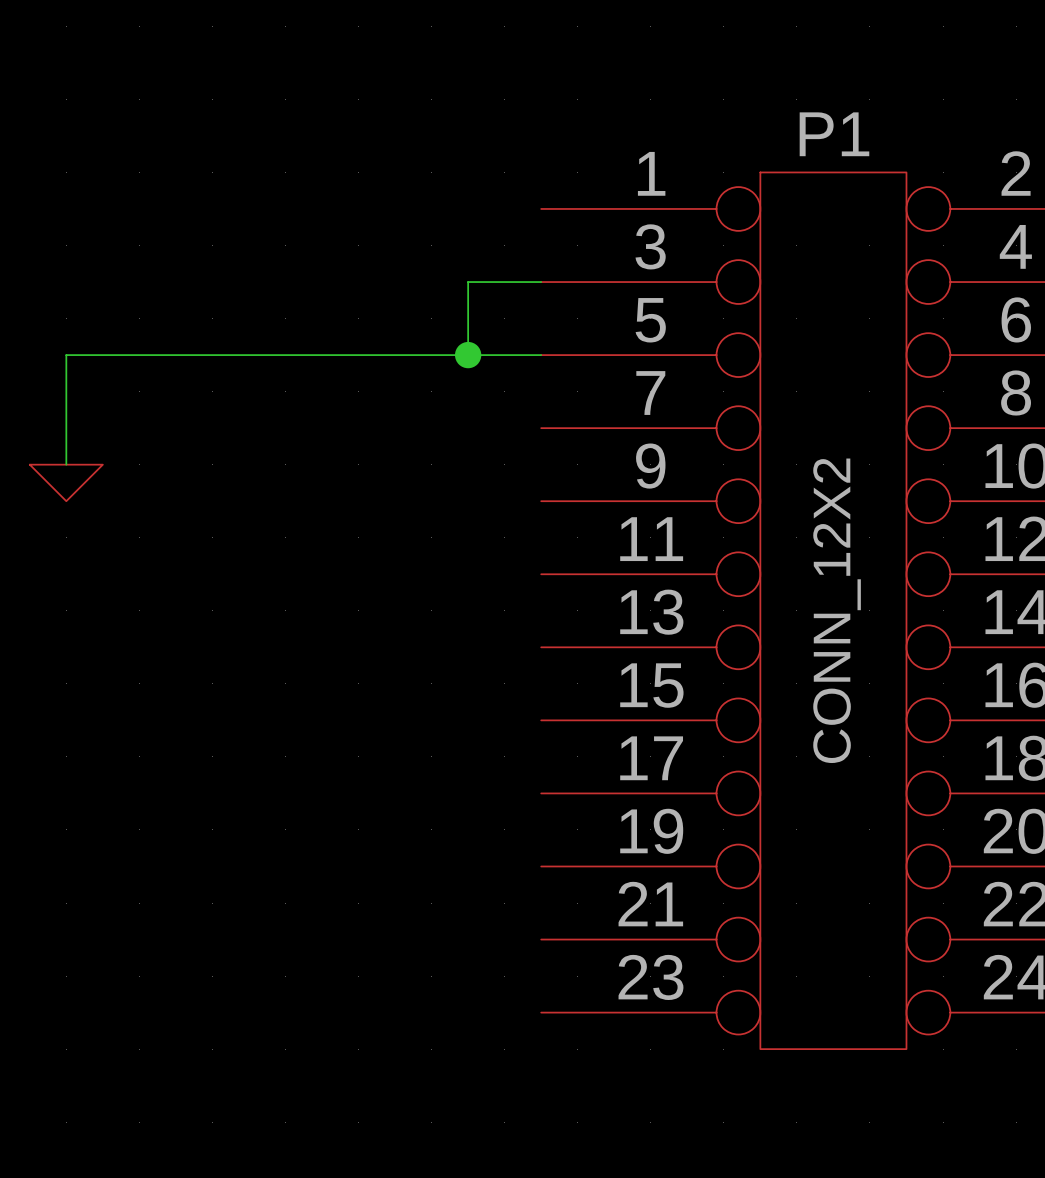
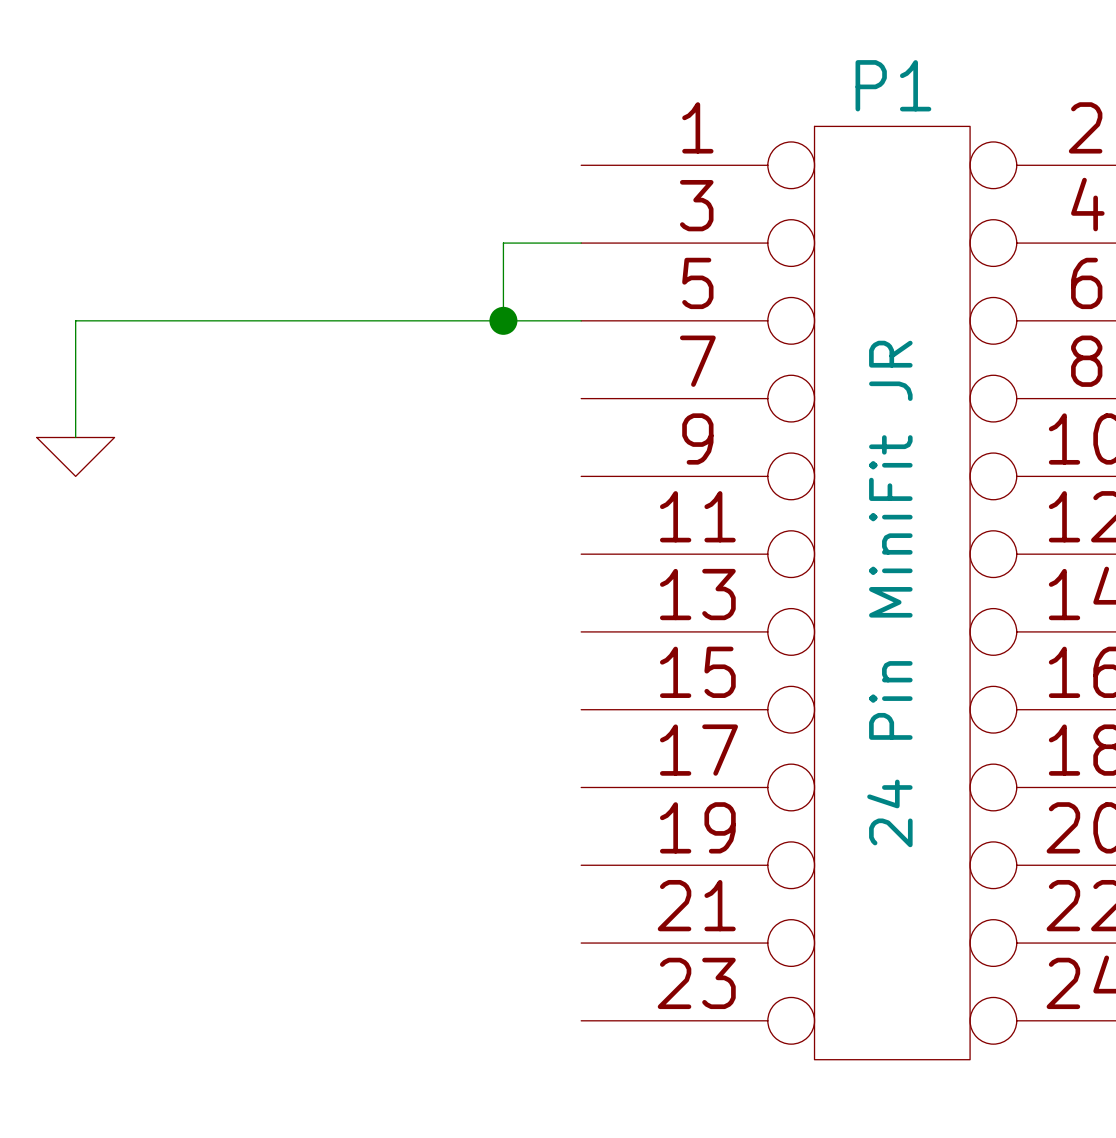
P1 value: CONN_12X2 (837, 610) -> 24 Pin MiniFit JR (889, 593)

